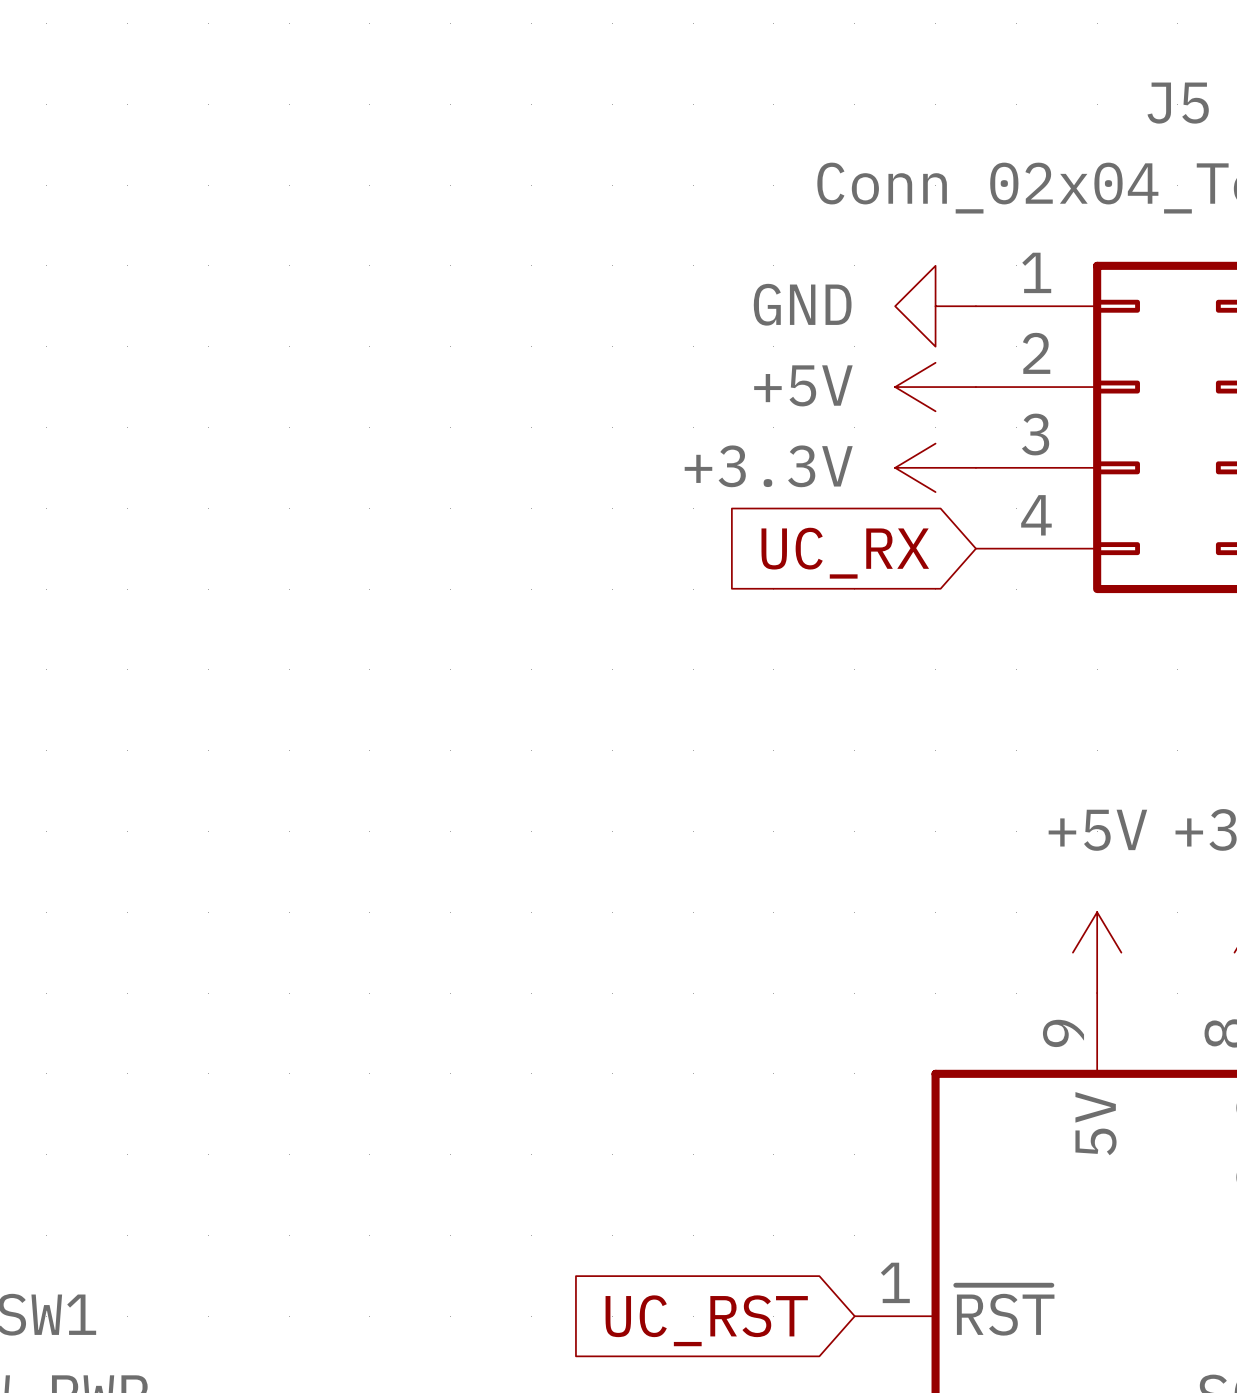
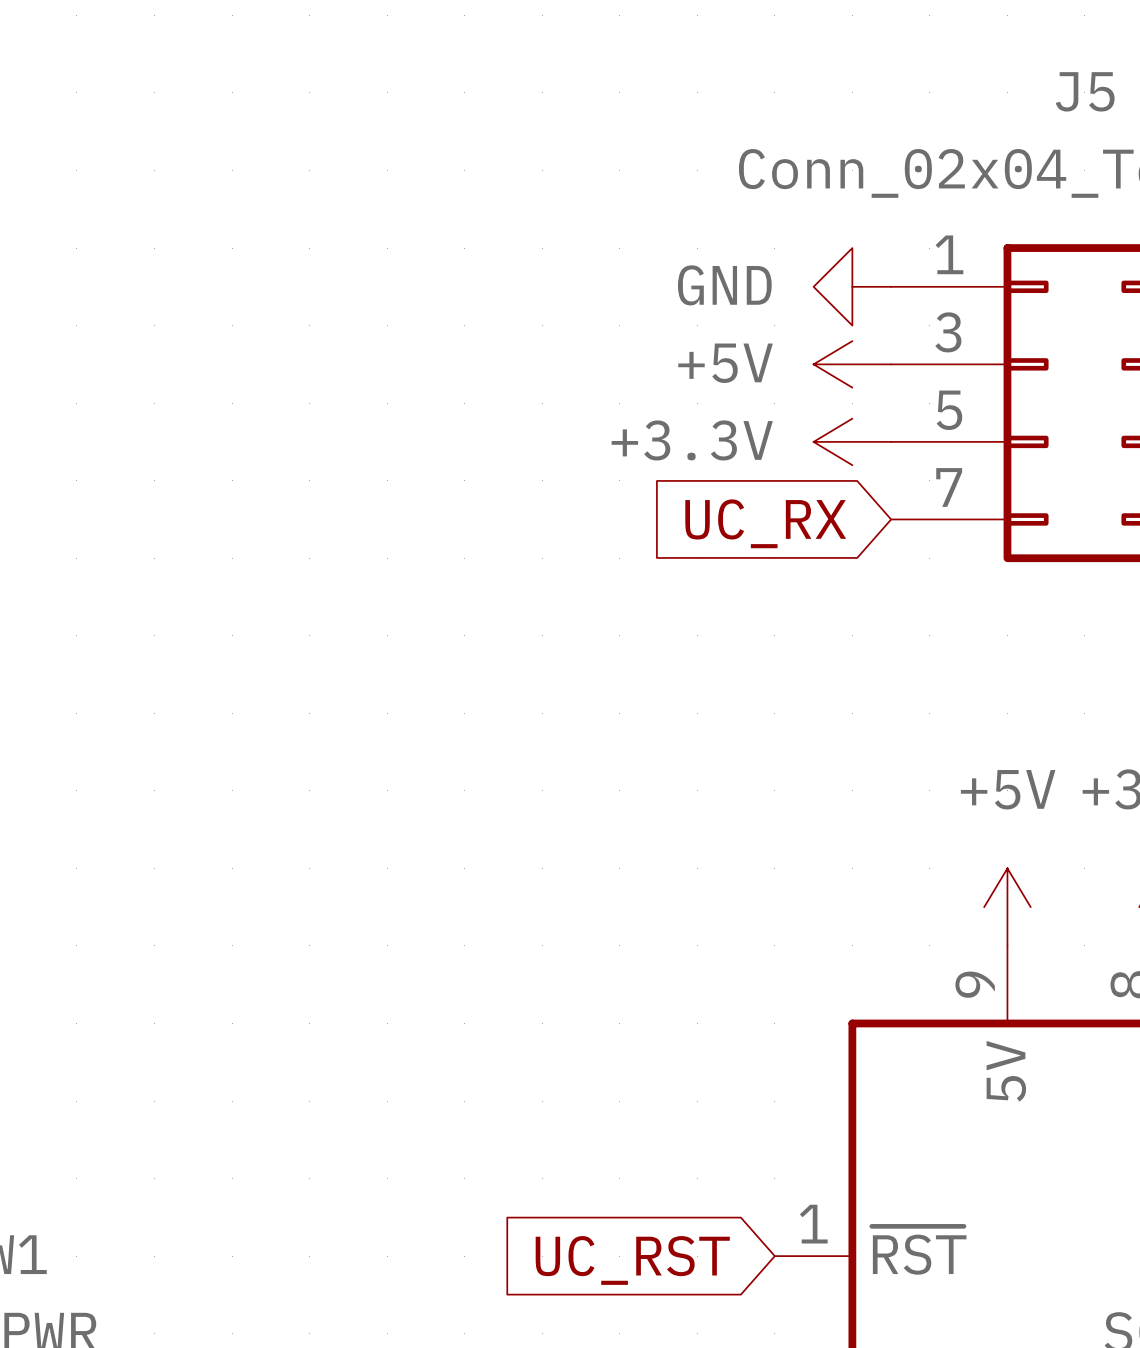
J5 pin number: 2 (1036, 353) -> 3 (948, 332)
J5 pin number: 3 (1035, 434) -> 5 (949, 410)
J5 pin number: 4 (1036, 515) -> 7 (949, 487)

